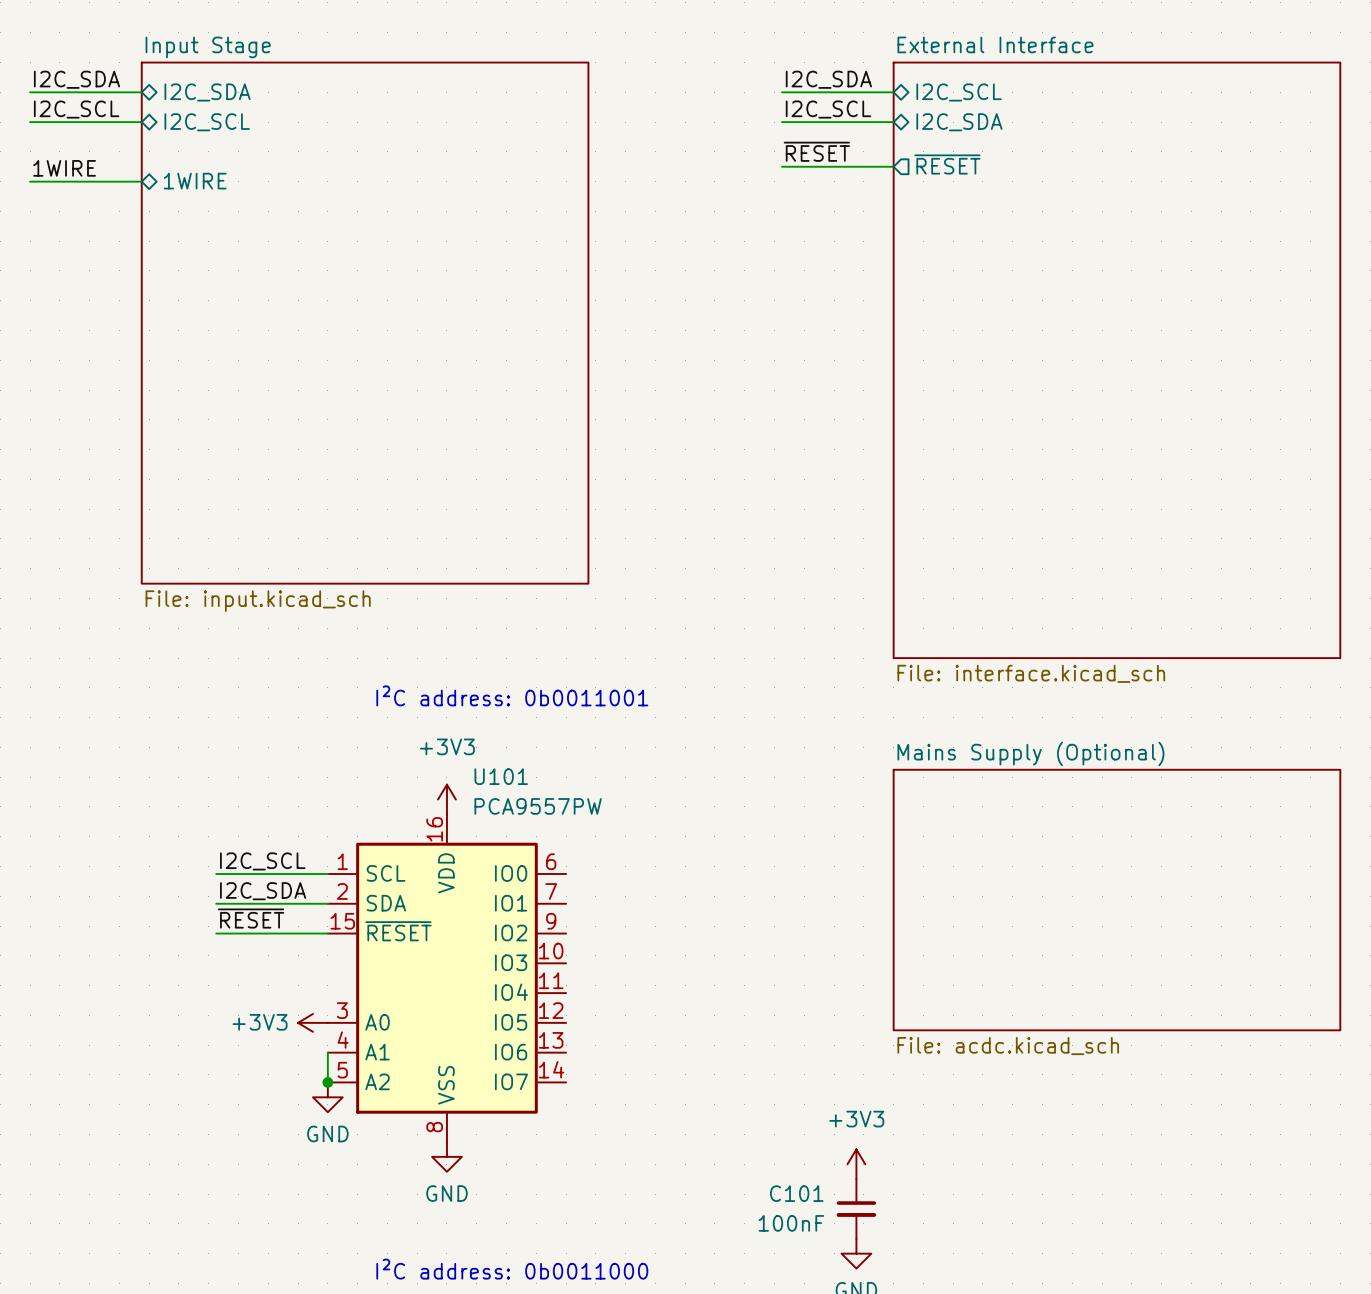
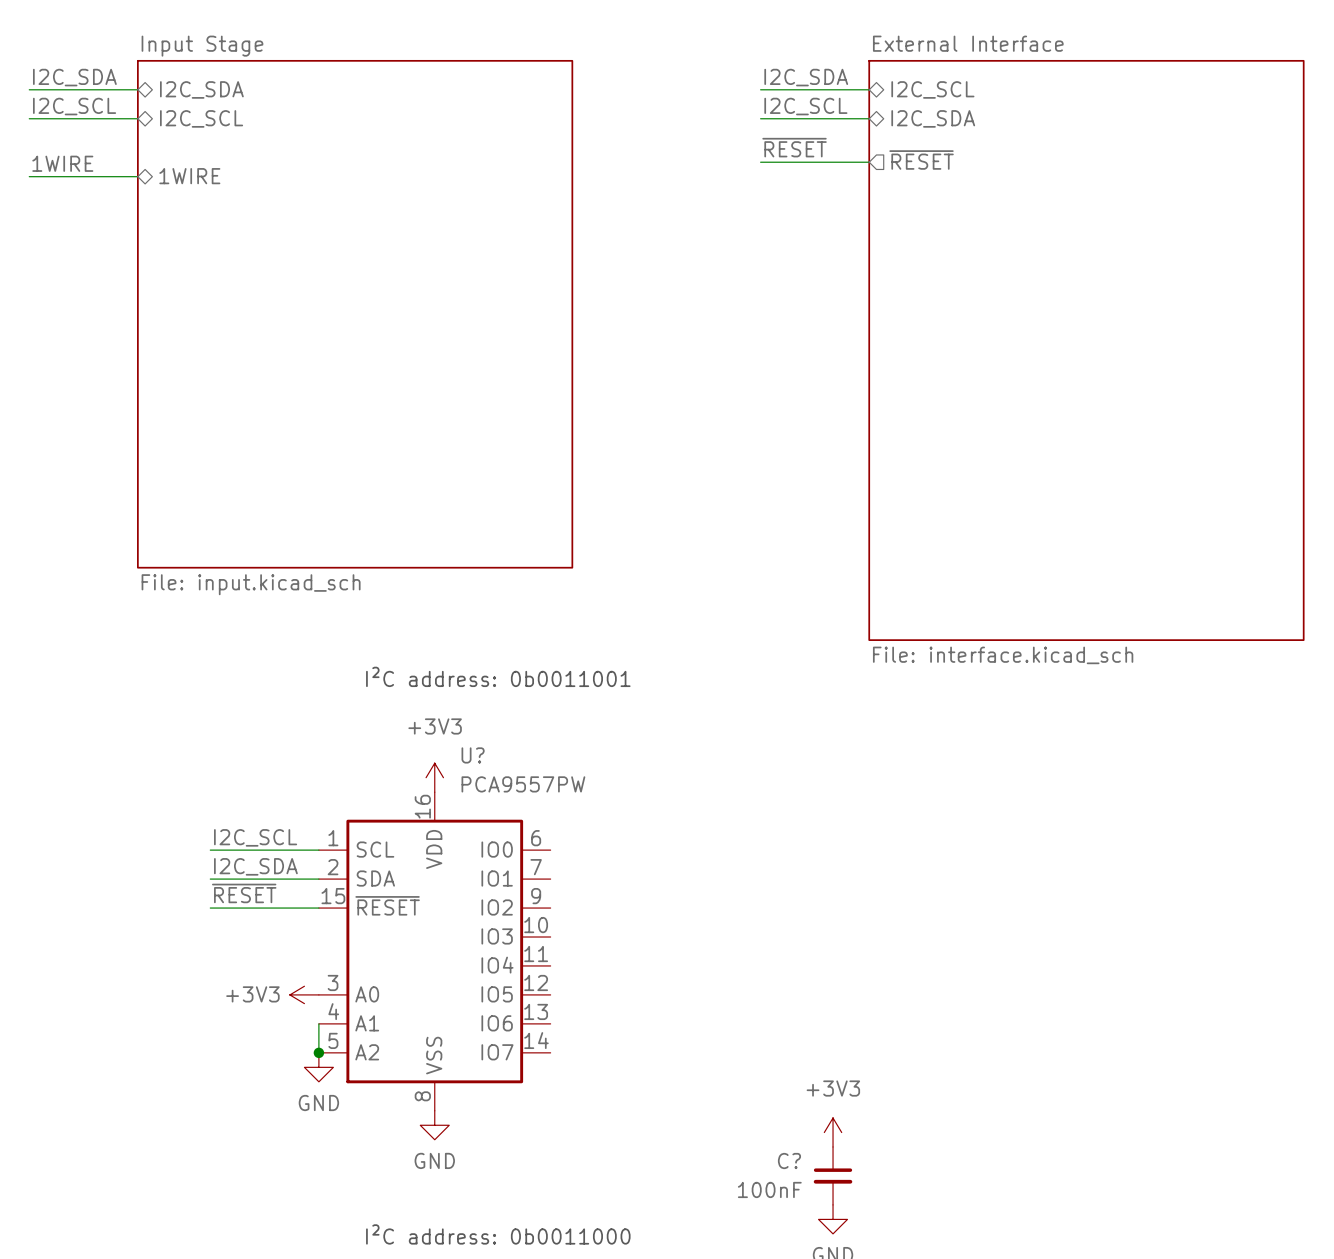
U101 name: U101 (501, 776) -> U? (473, 755)
sheet Mains Supply (Optional): File: acdc.kicad_sch (1116, 900) -> none
C101 name: C101 (796, 1193) -> C? (789, 1161)

